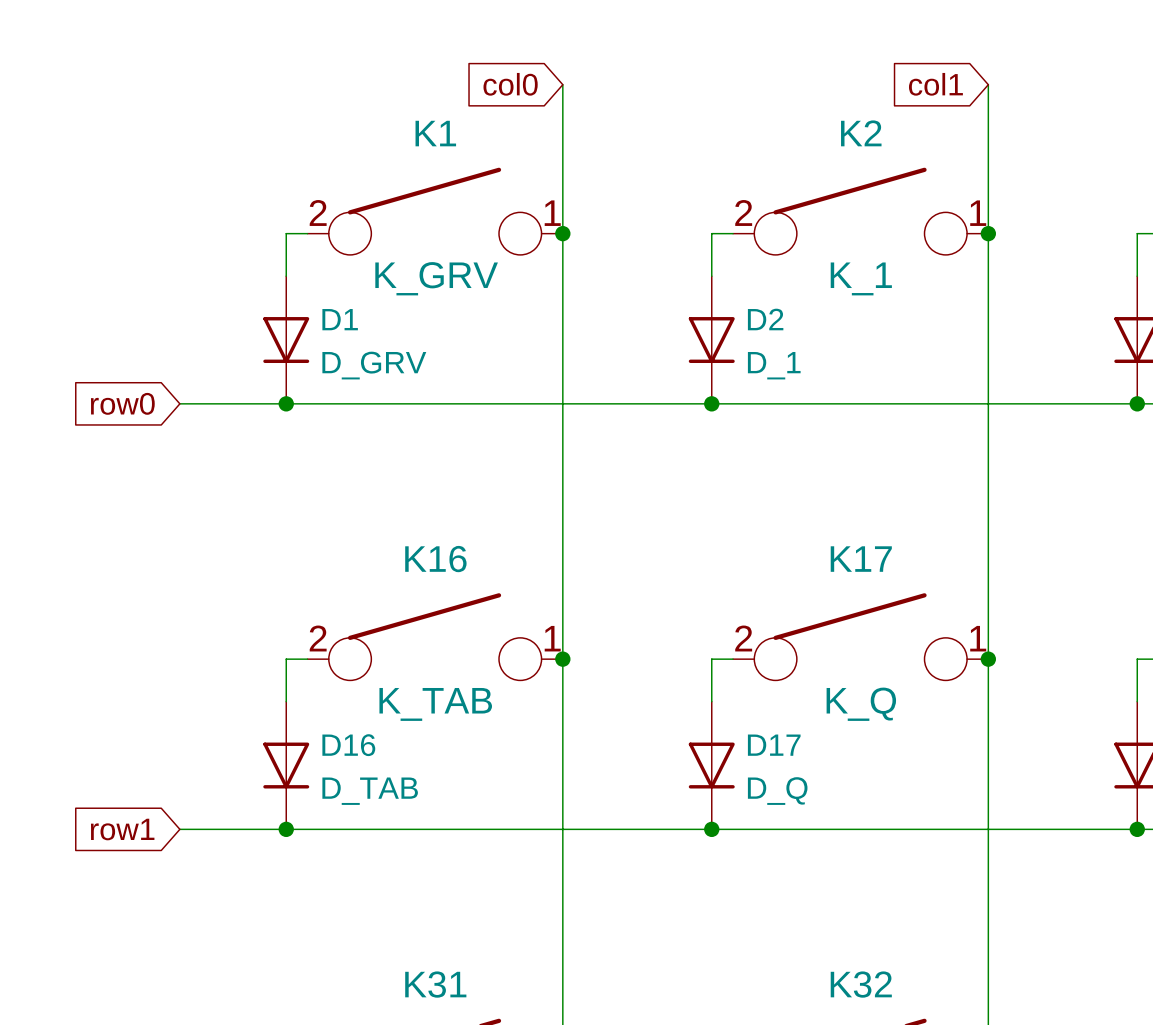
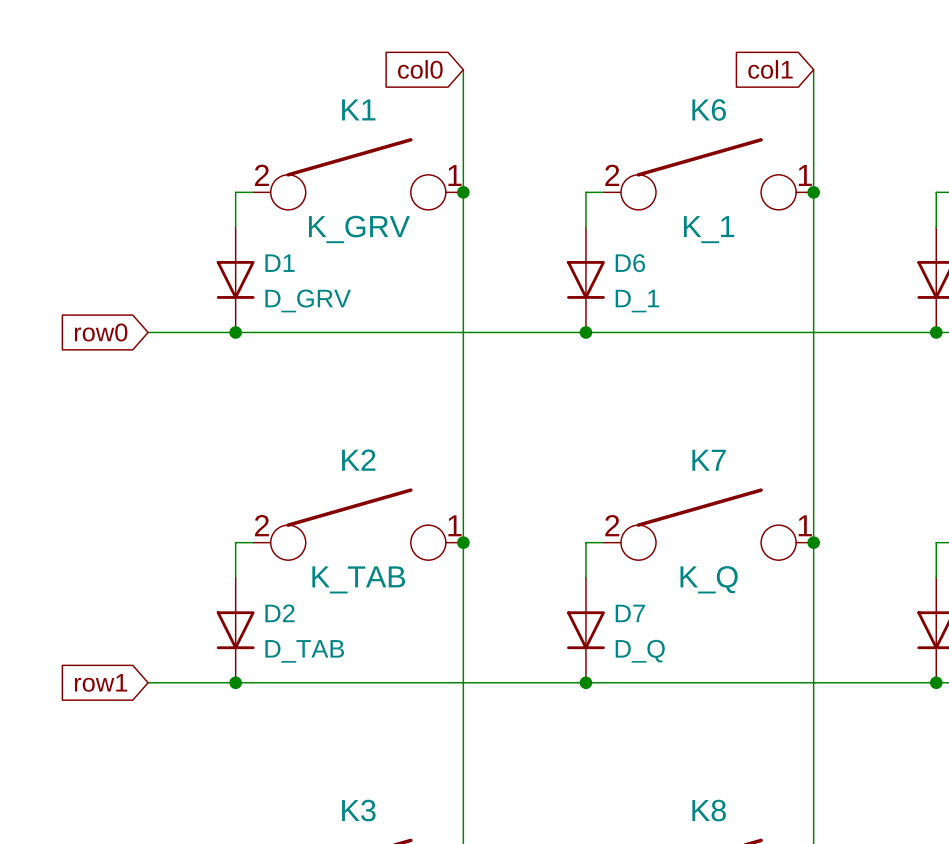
K2 name: K2 (861, 133) -> K6 (709, 109)
D2 name: D2 (765, 319) -> D6 (630, 263)
K16 name: K16 (435, 559) -> K2 (358, 460)
K17 name: K17 (861, 559) -> K7 (709, 460)
D16 name: D16 (348, 745) -> D2 (280, 613)
D17 name: D17 (774, 745) -> D7 (630, 613)
K31 name: K31 (435, 984) -> K3 (358, 810)
K32 name: K32 (861, 984) -> K8 (709, 810)

